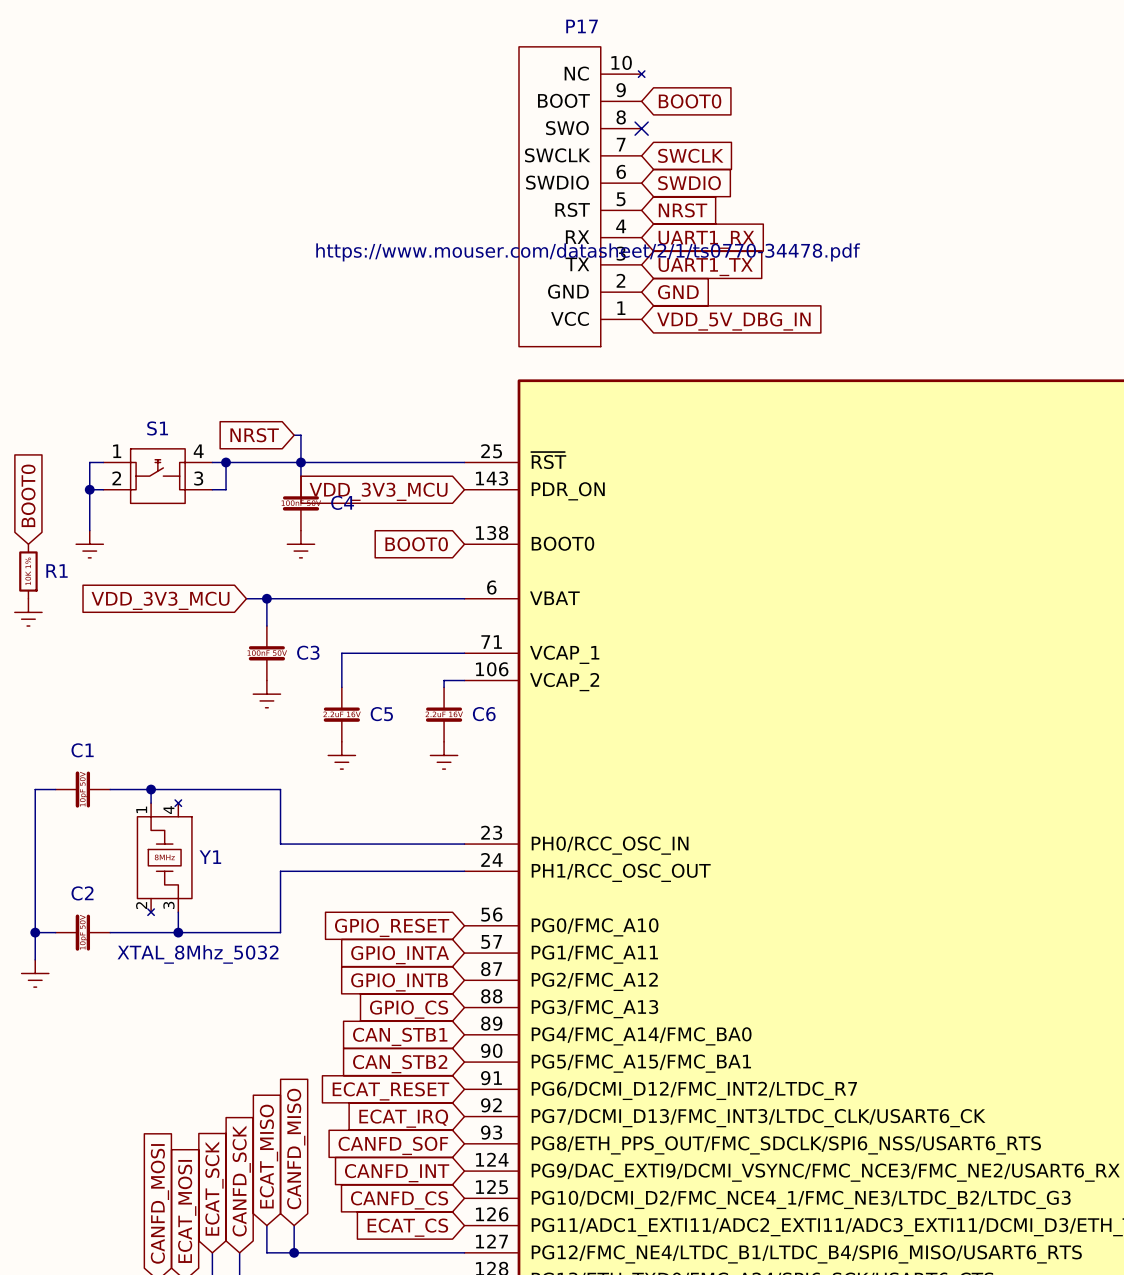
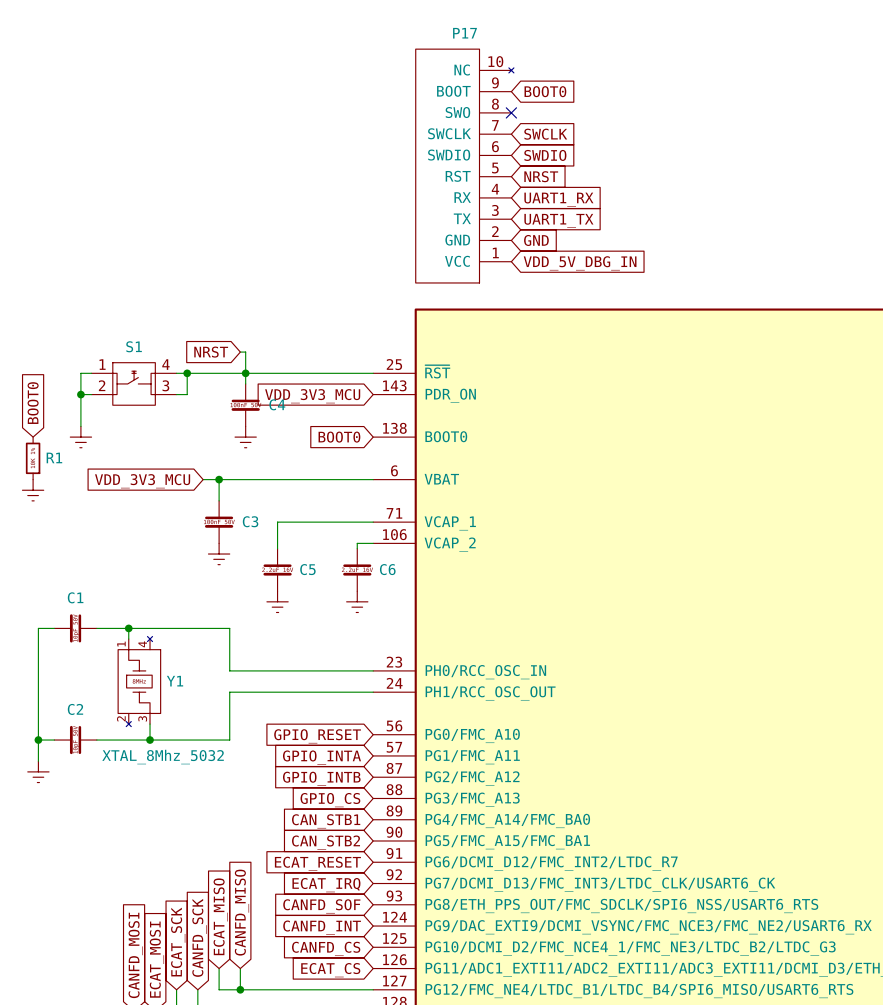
P17 text: https://www.mouser.com/datasheet/2/1/ts0770-34478.pdf (588, 252) -> none

